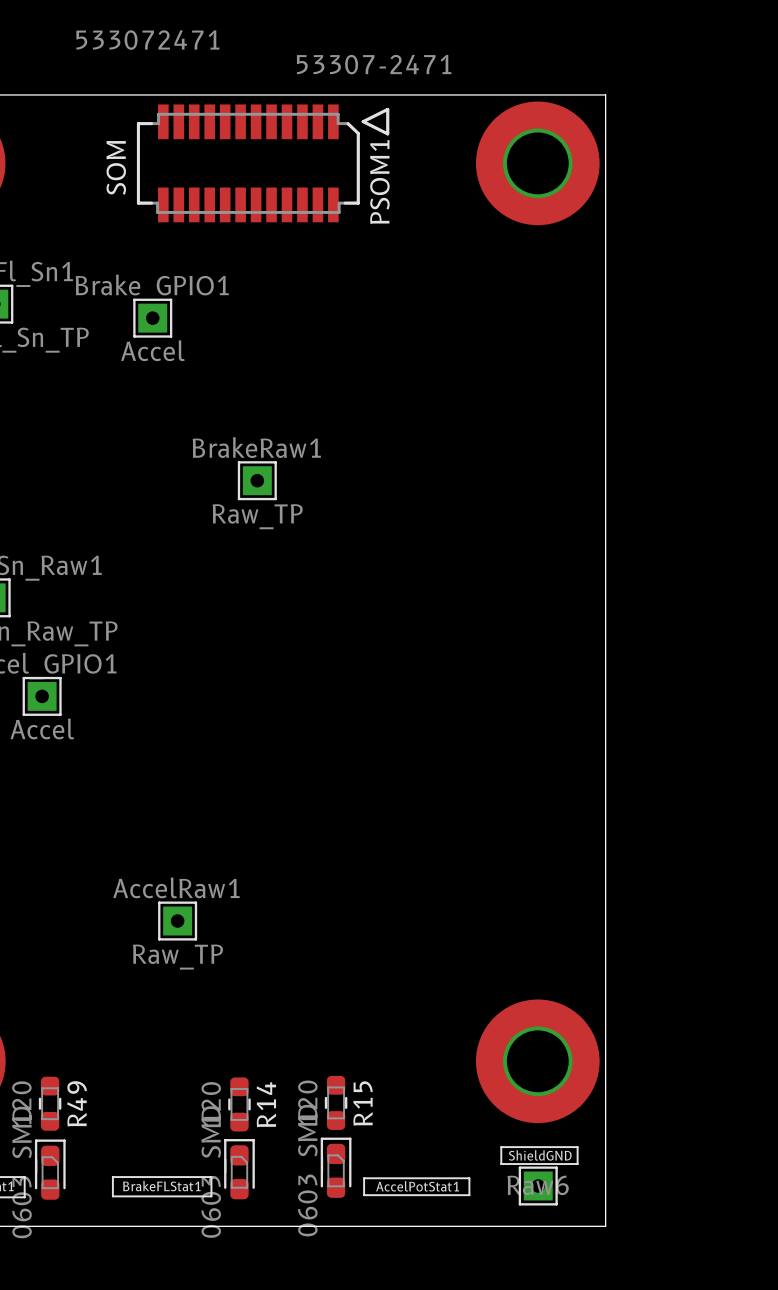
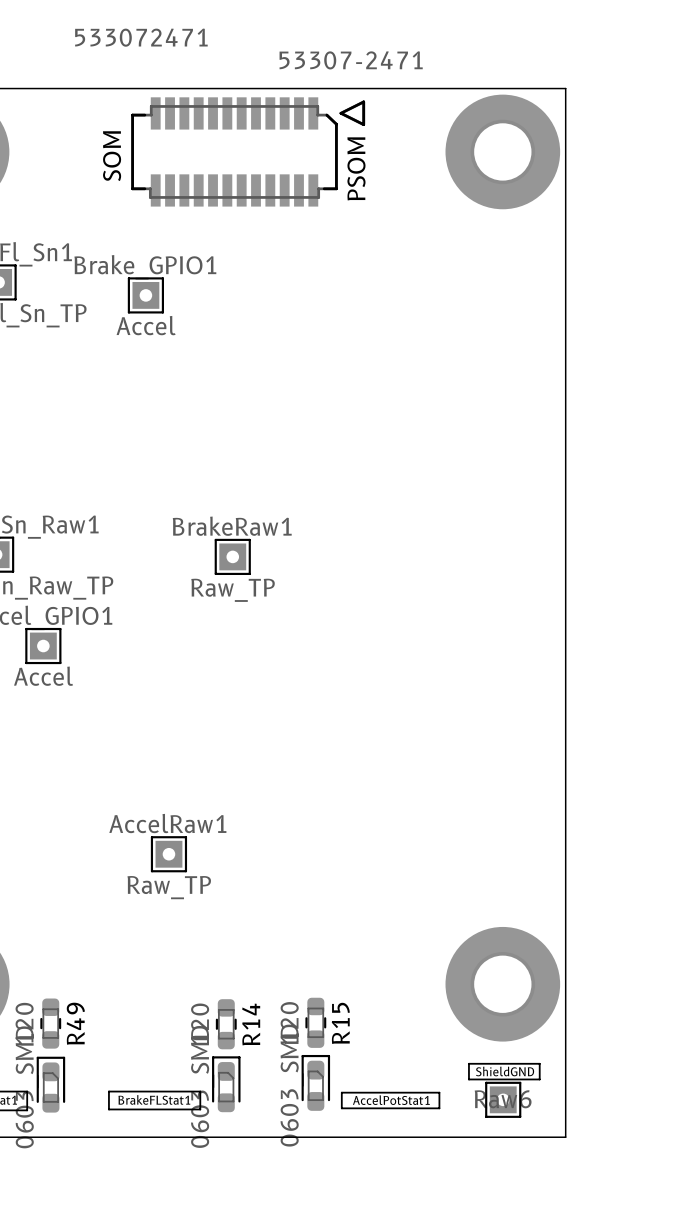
PSOM1 name: PSOM1 (379, 182) -> PSOM (356, 168)
BrakeRaw1 position: (257, 480) -> (232, 556)

